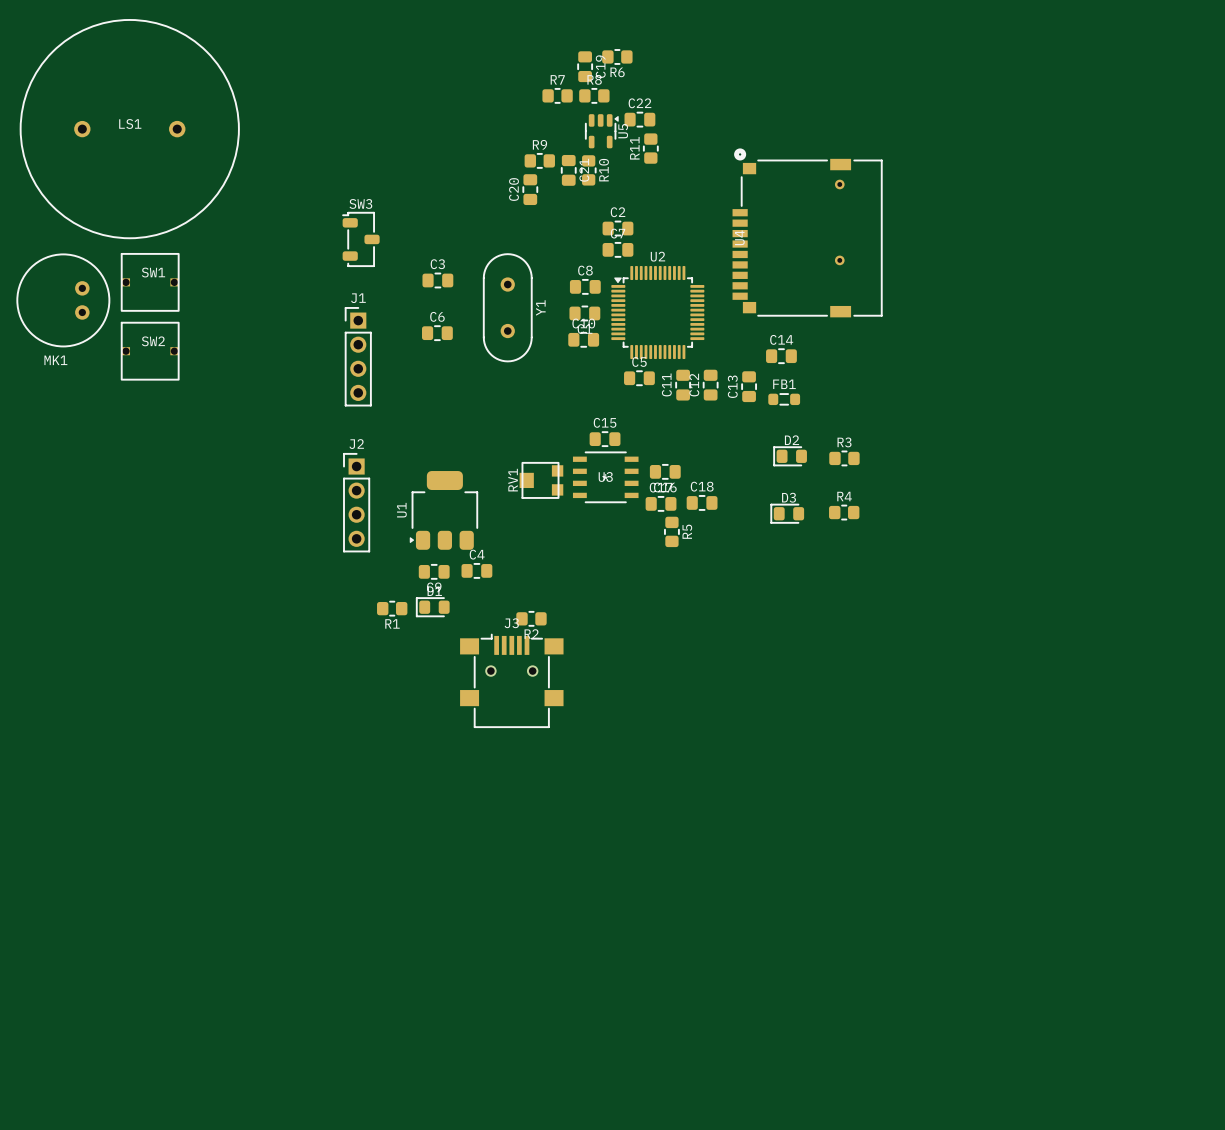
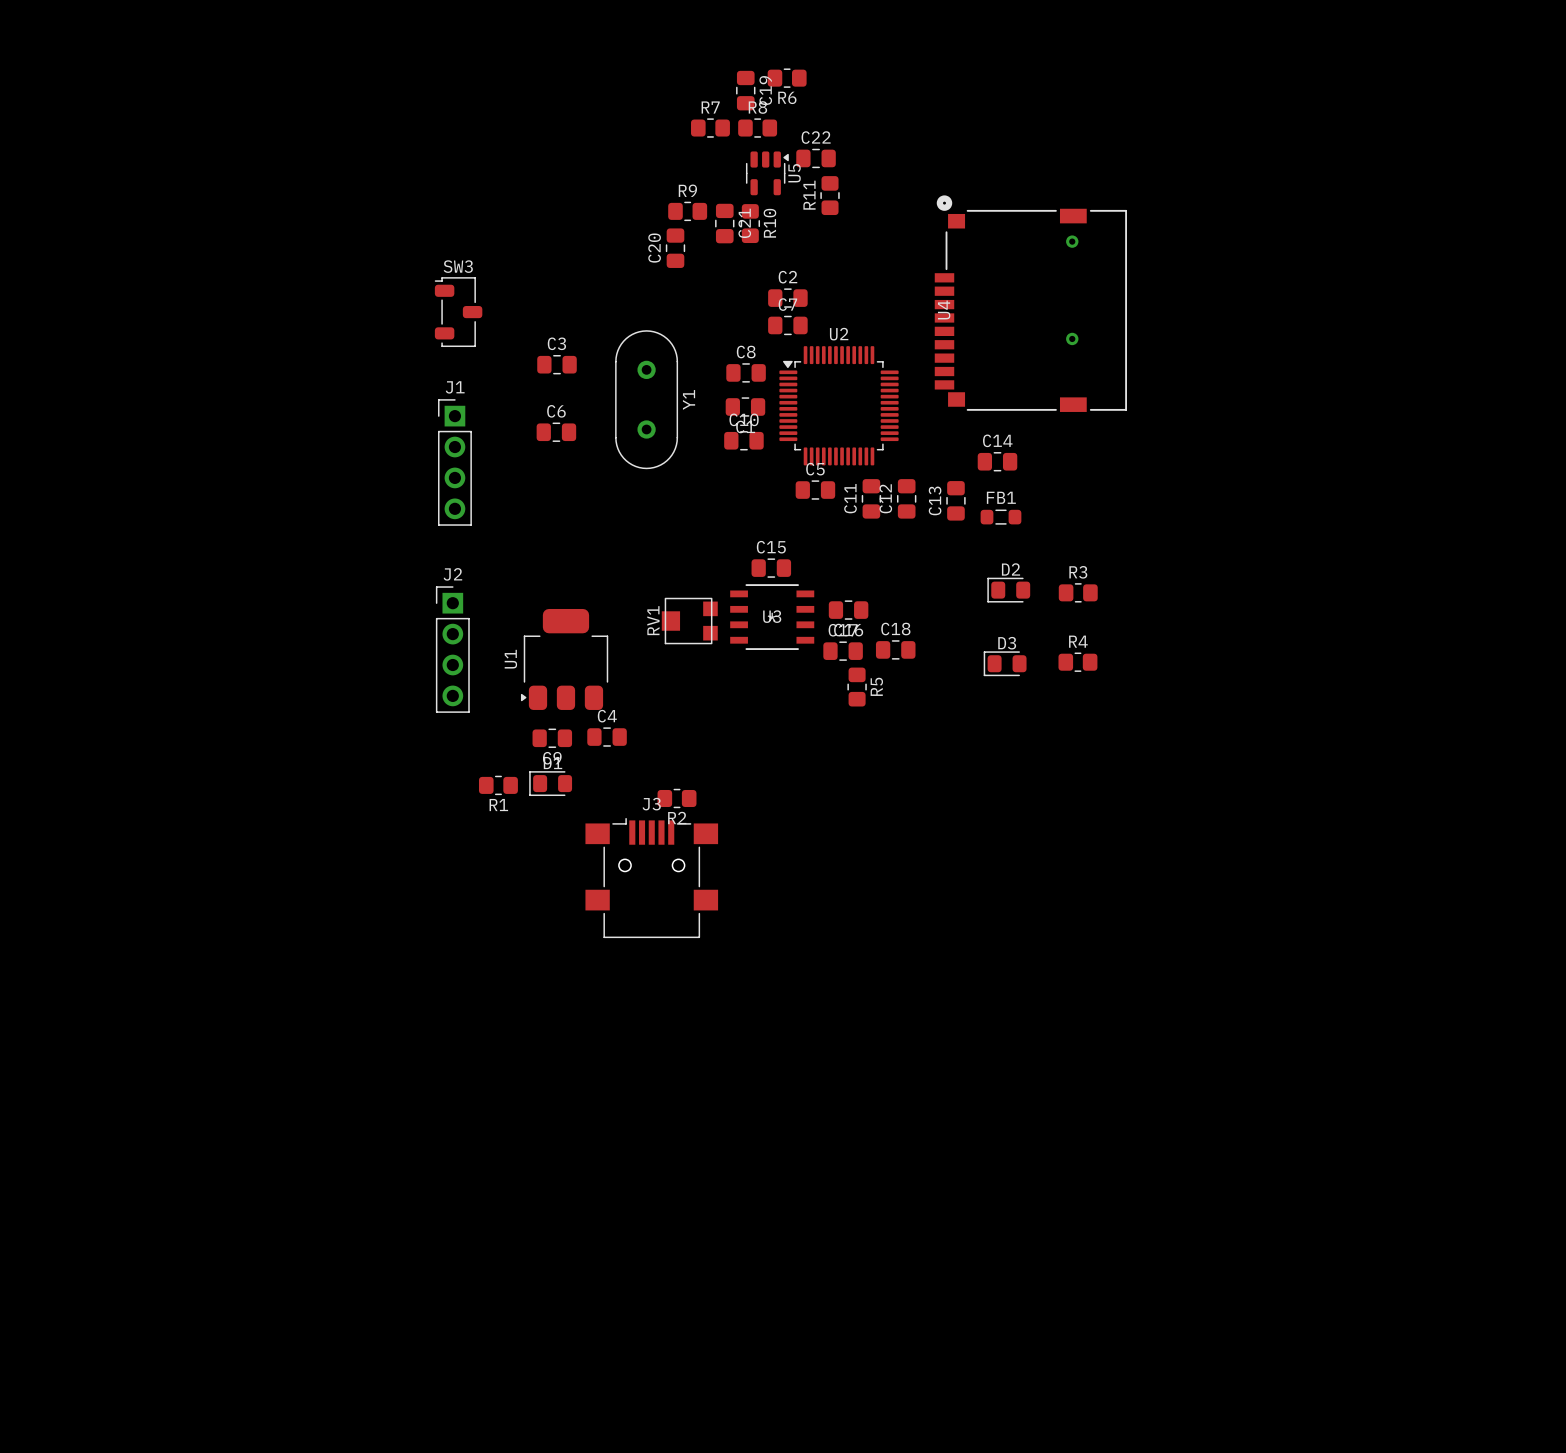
LS1: (129, 129) -> none
SW1: (150, 282) -> none
MK1: (63, 300) -> none
SW2: (150, 351) -> none

